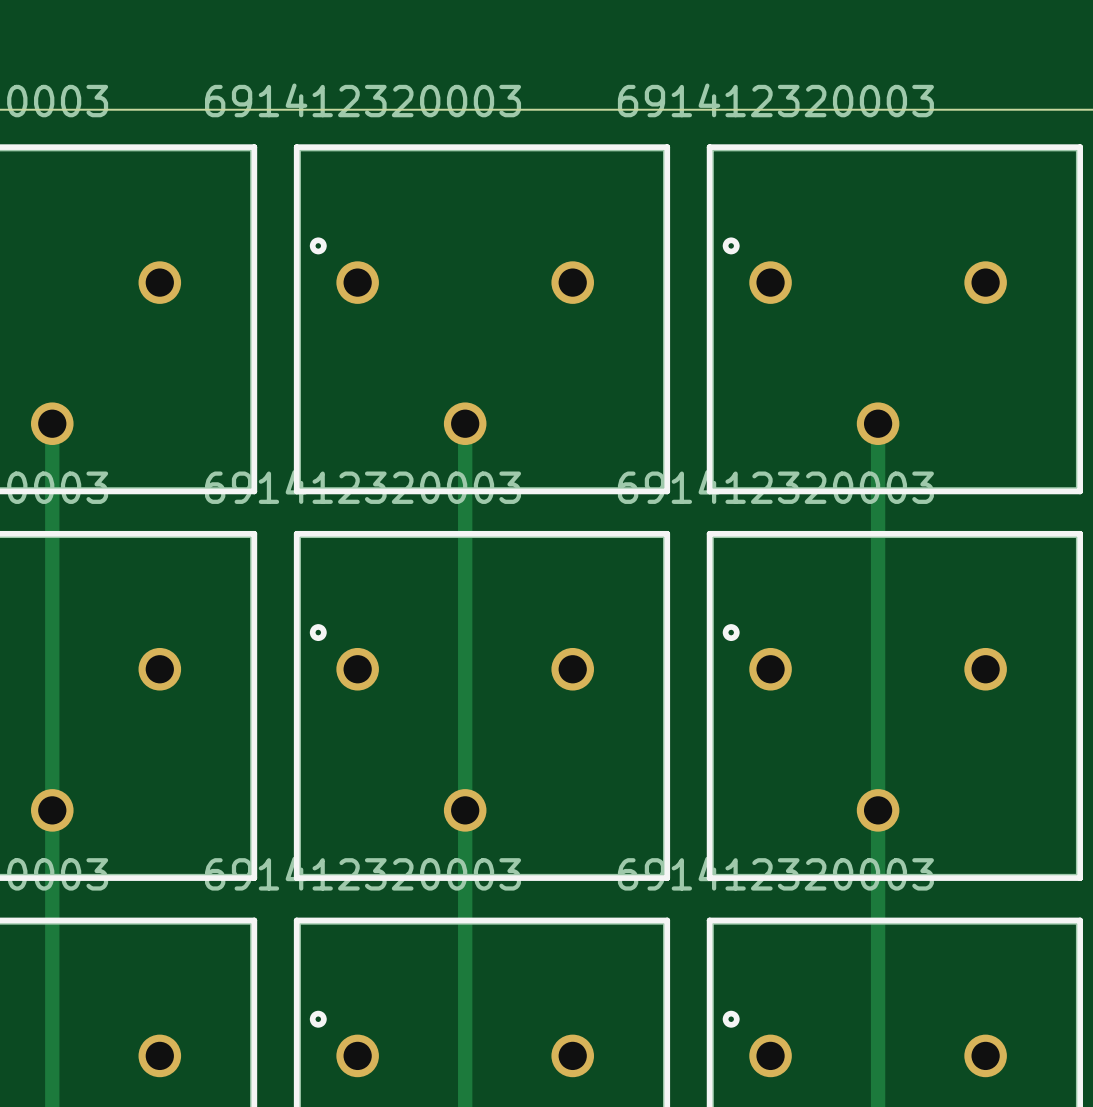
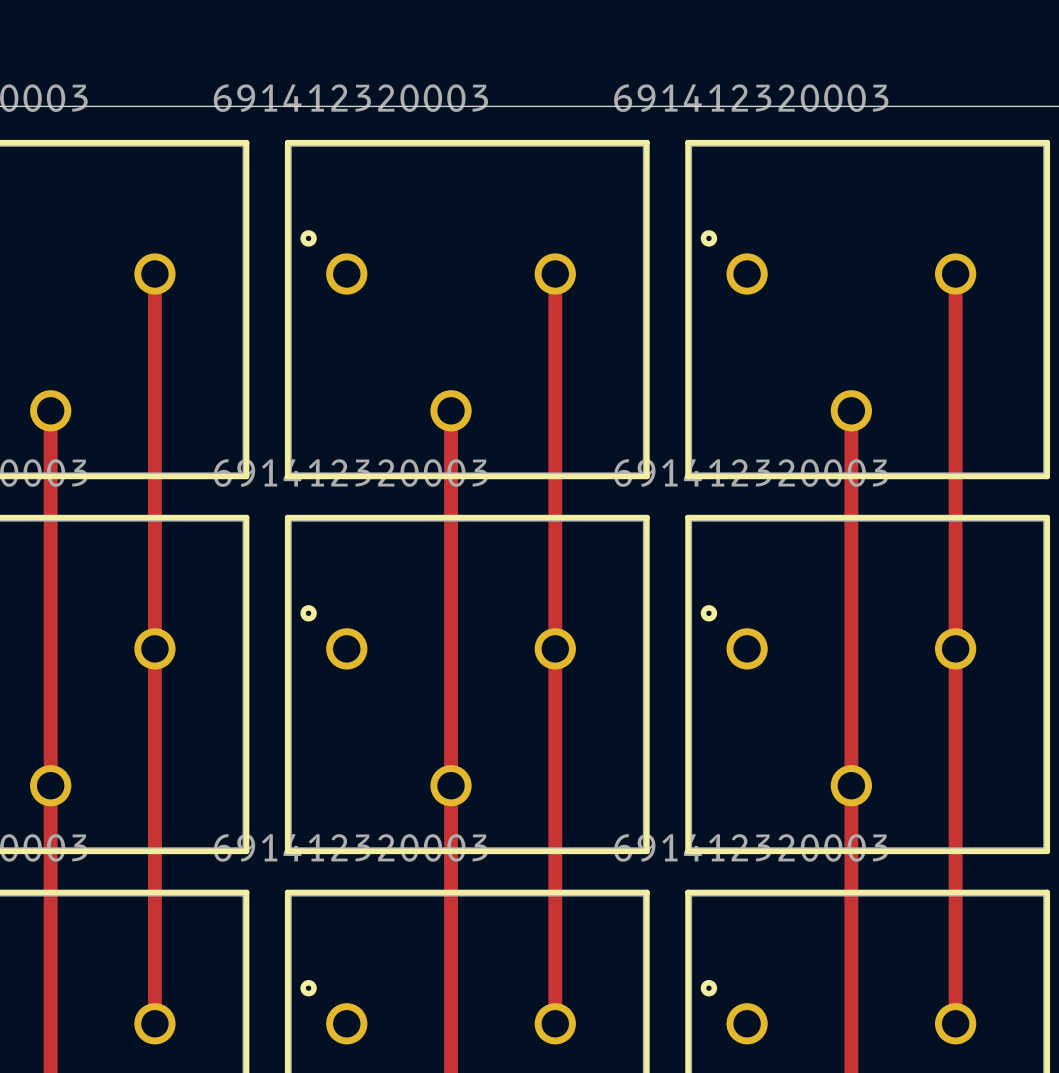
track: none -> (154, 274) (154, 1023)
track: none -> (555, 274) (555, 1023)
track: none -> (955, 274) (955, 1023)

